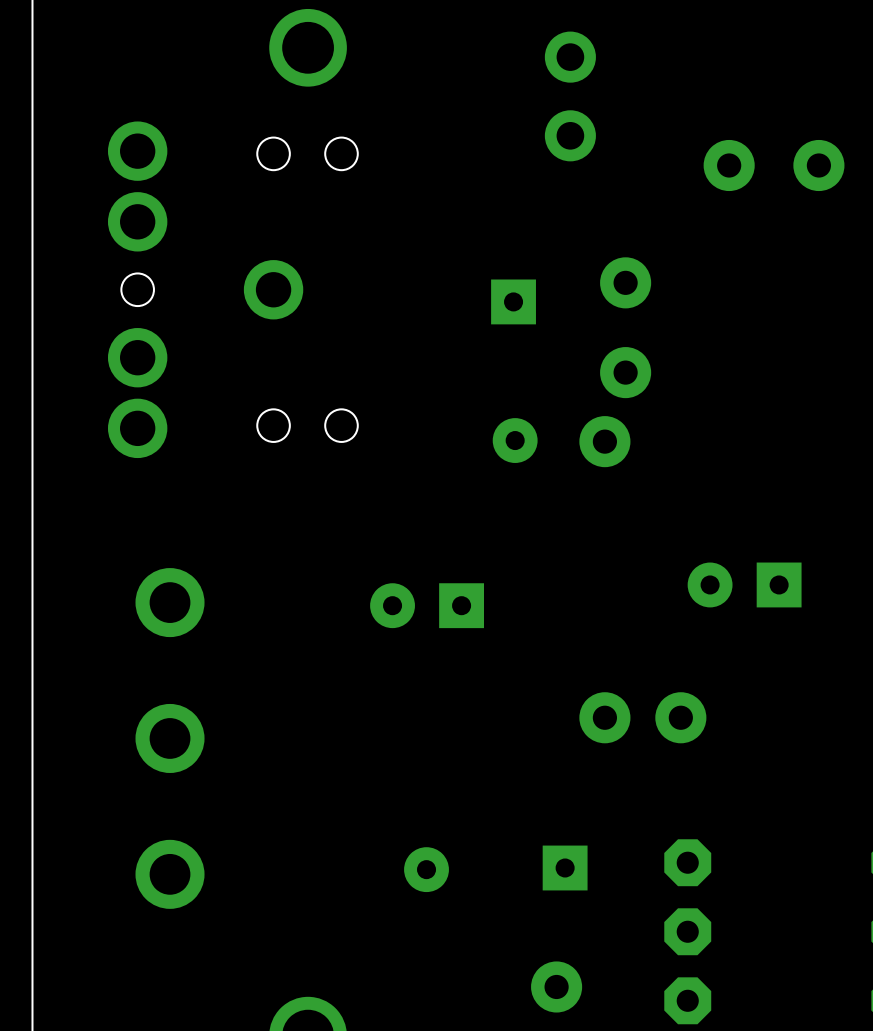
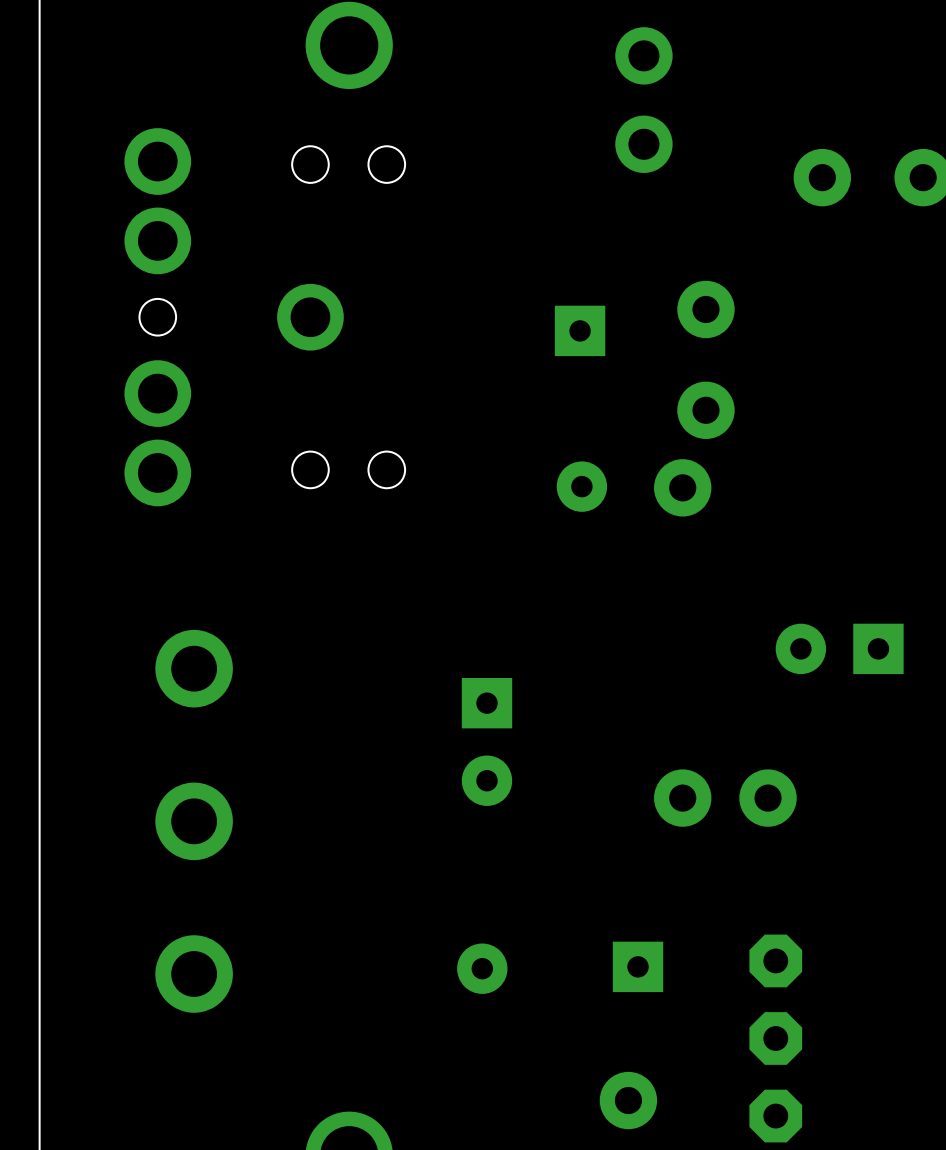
part rotation: 0° (427, 605) -> 90° counterclockwise (487, 741)

